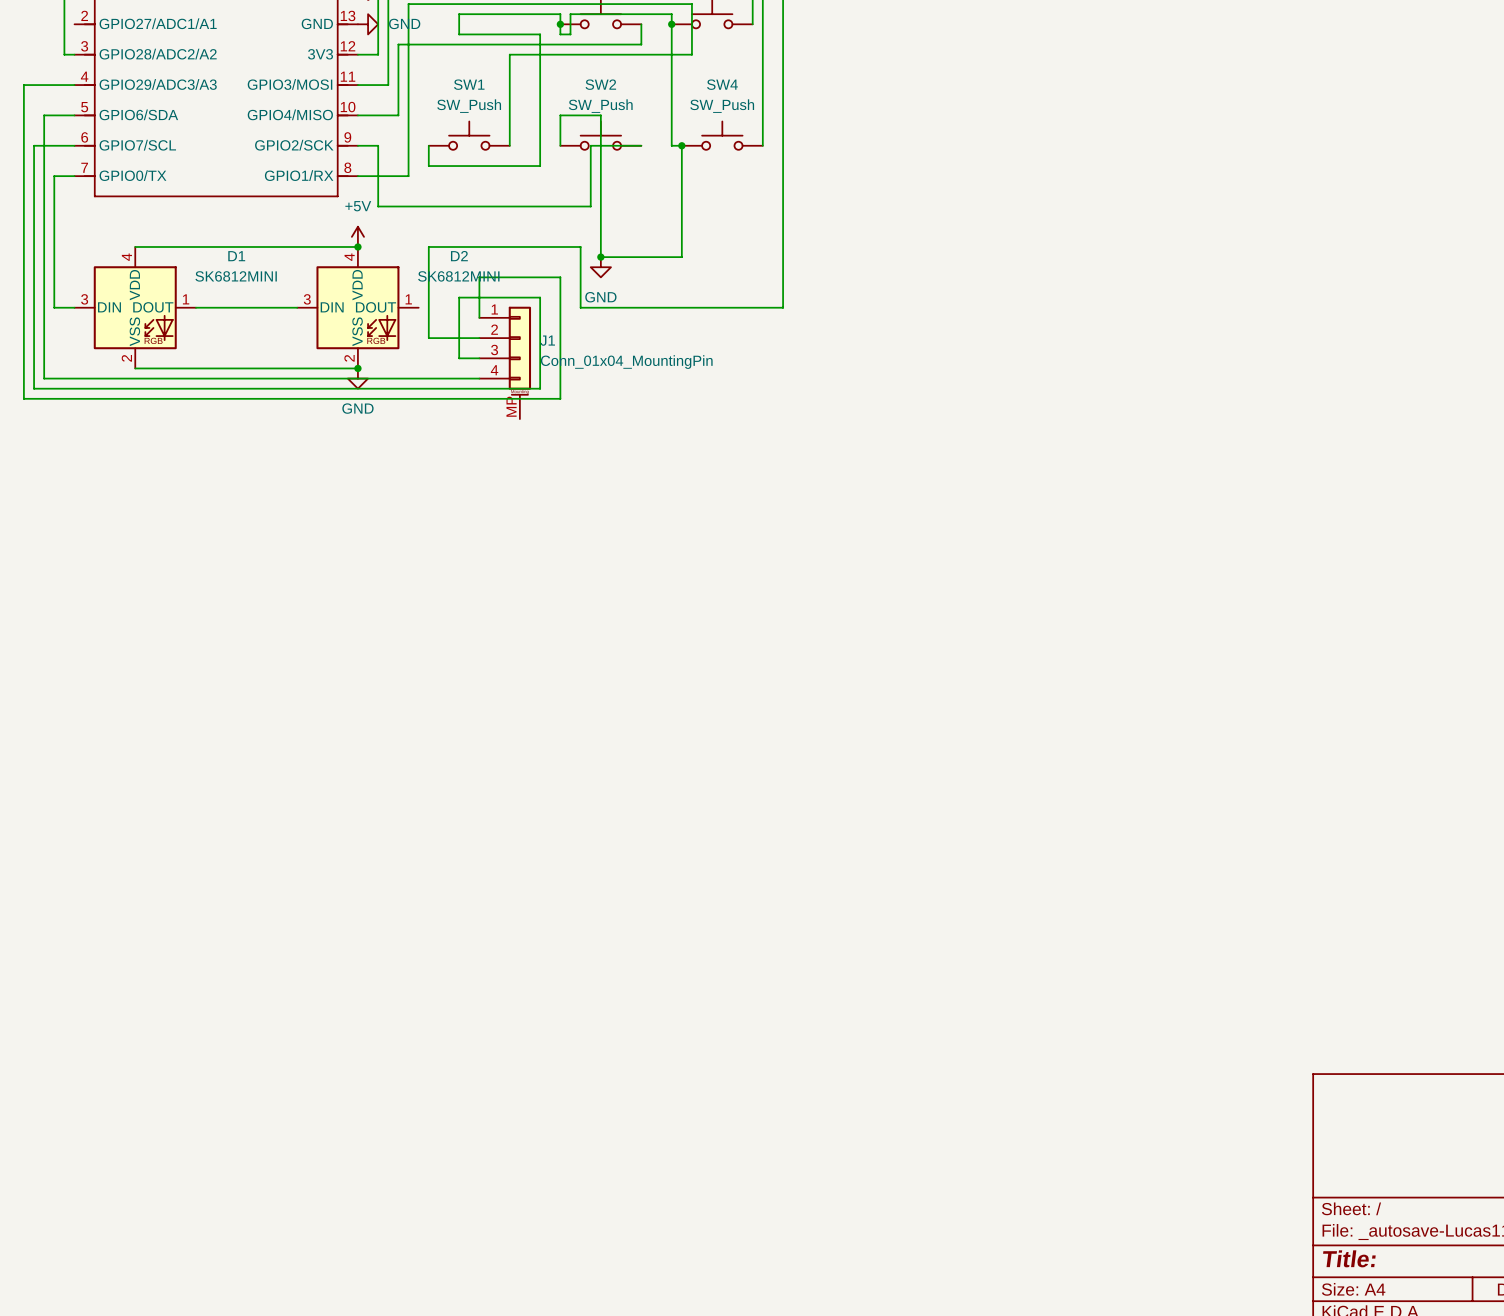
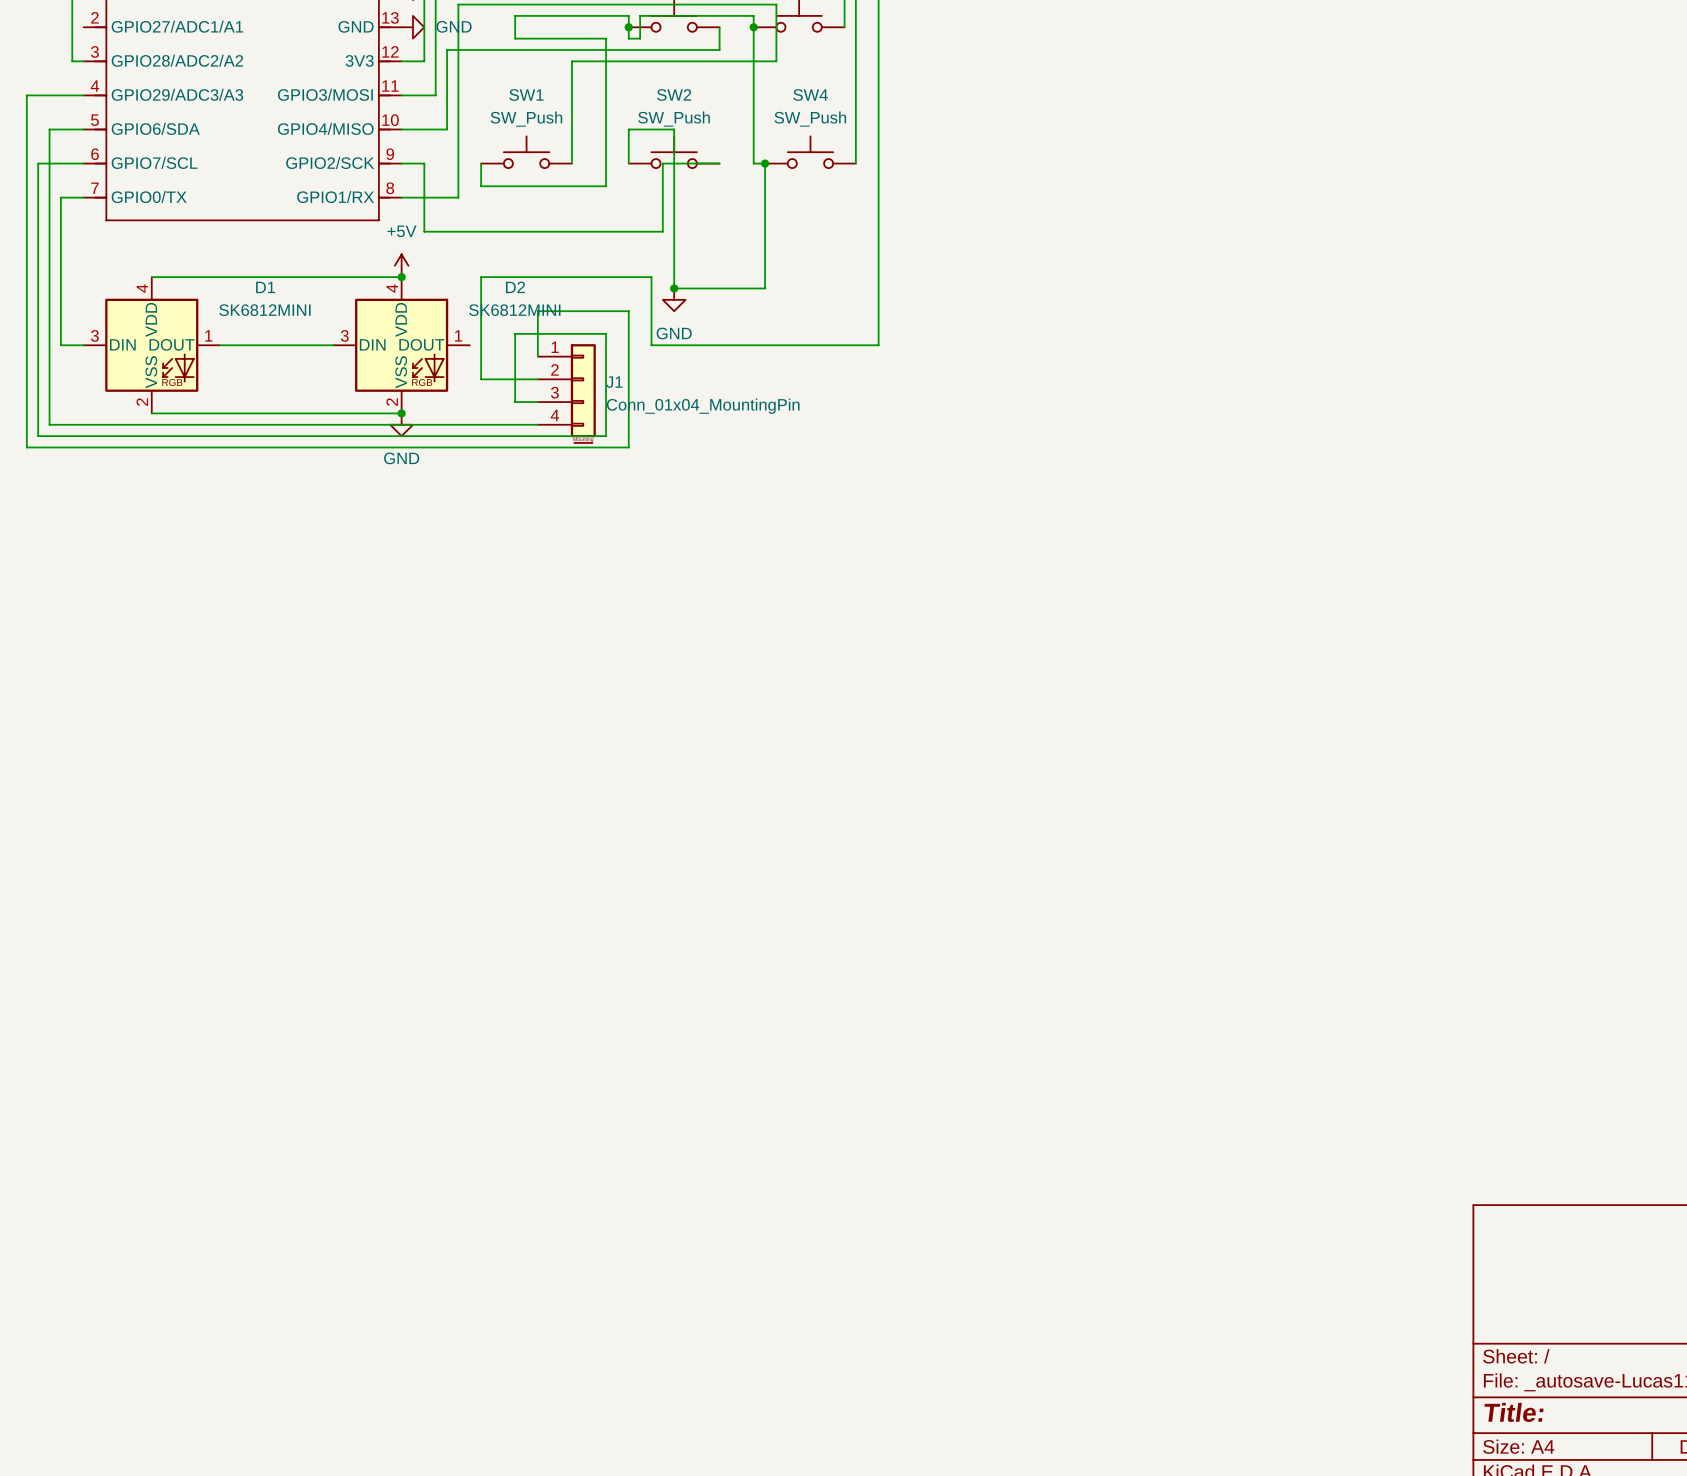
J1 symbol: [479, 306, 532, 420] -> [537, 344, 596, 444]

